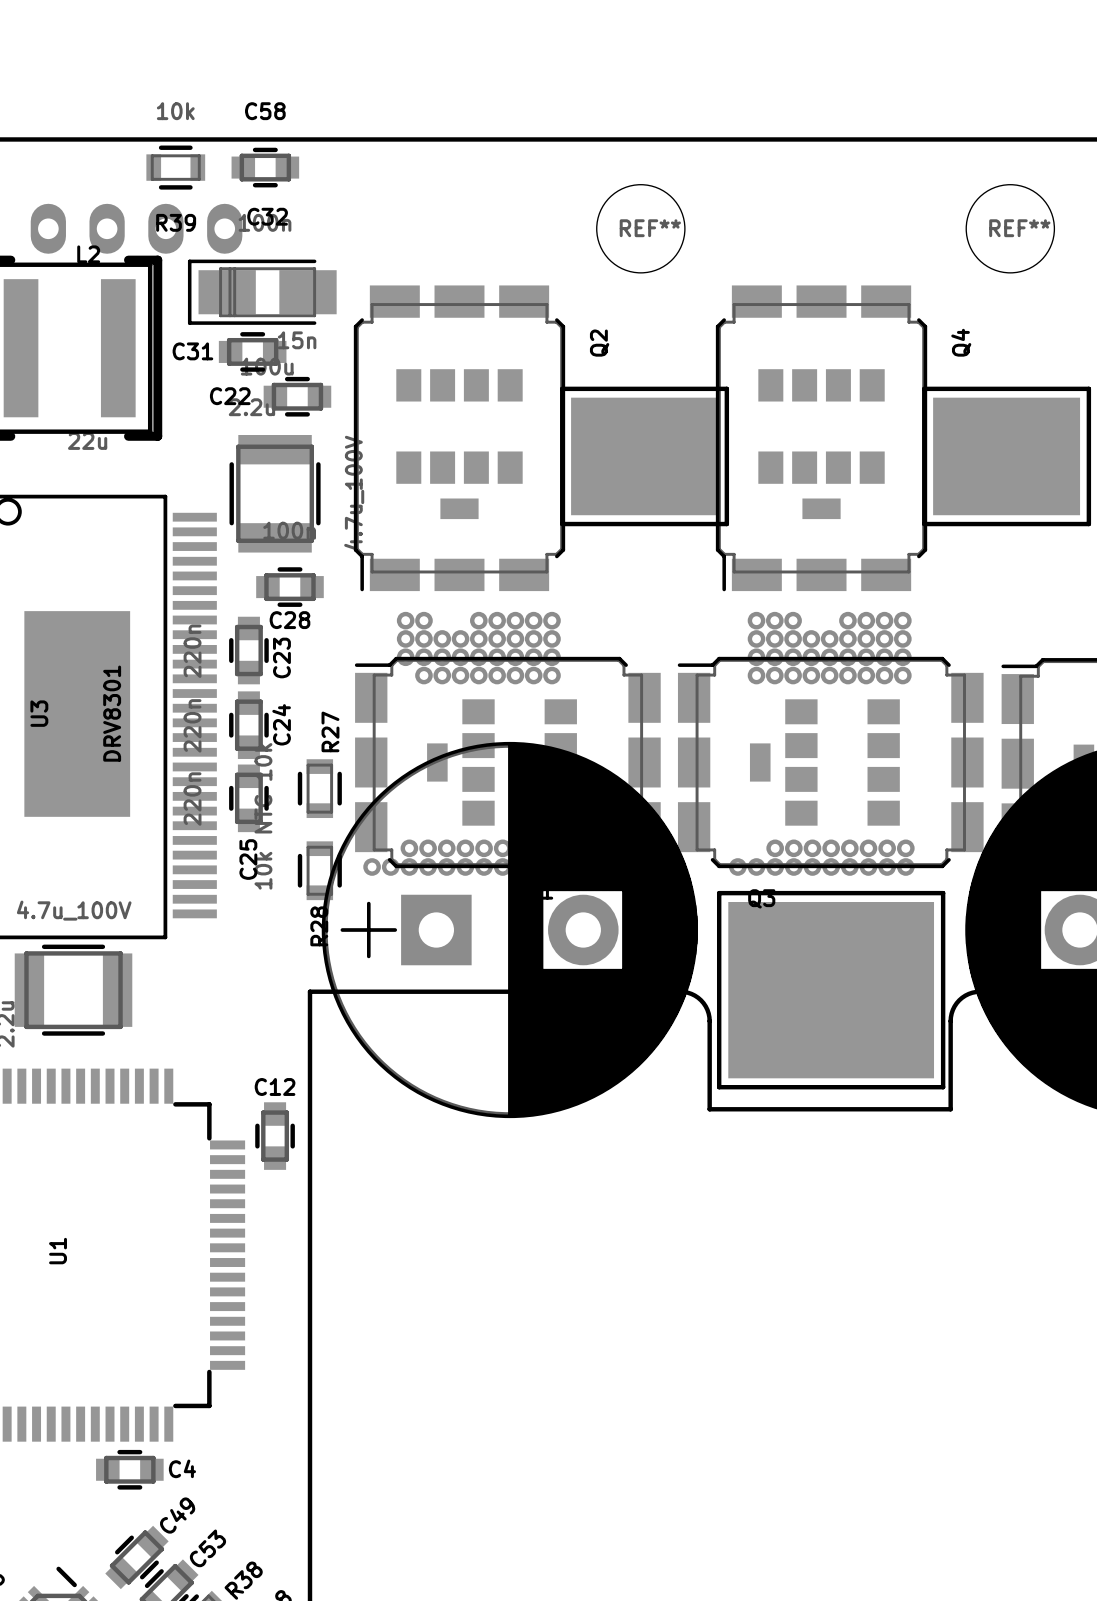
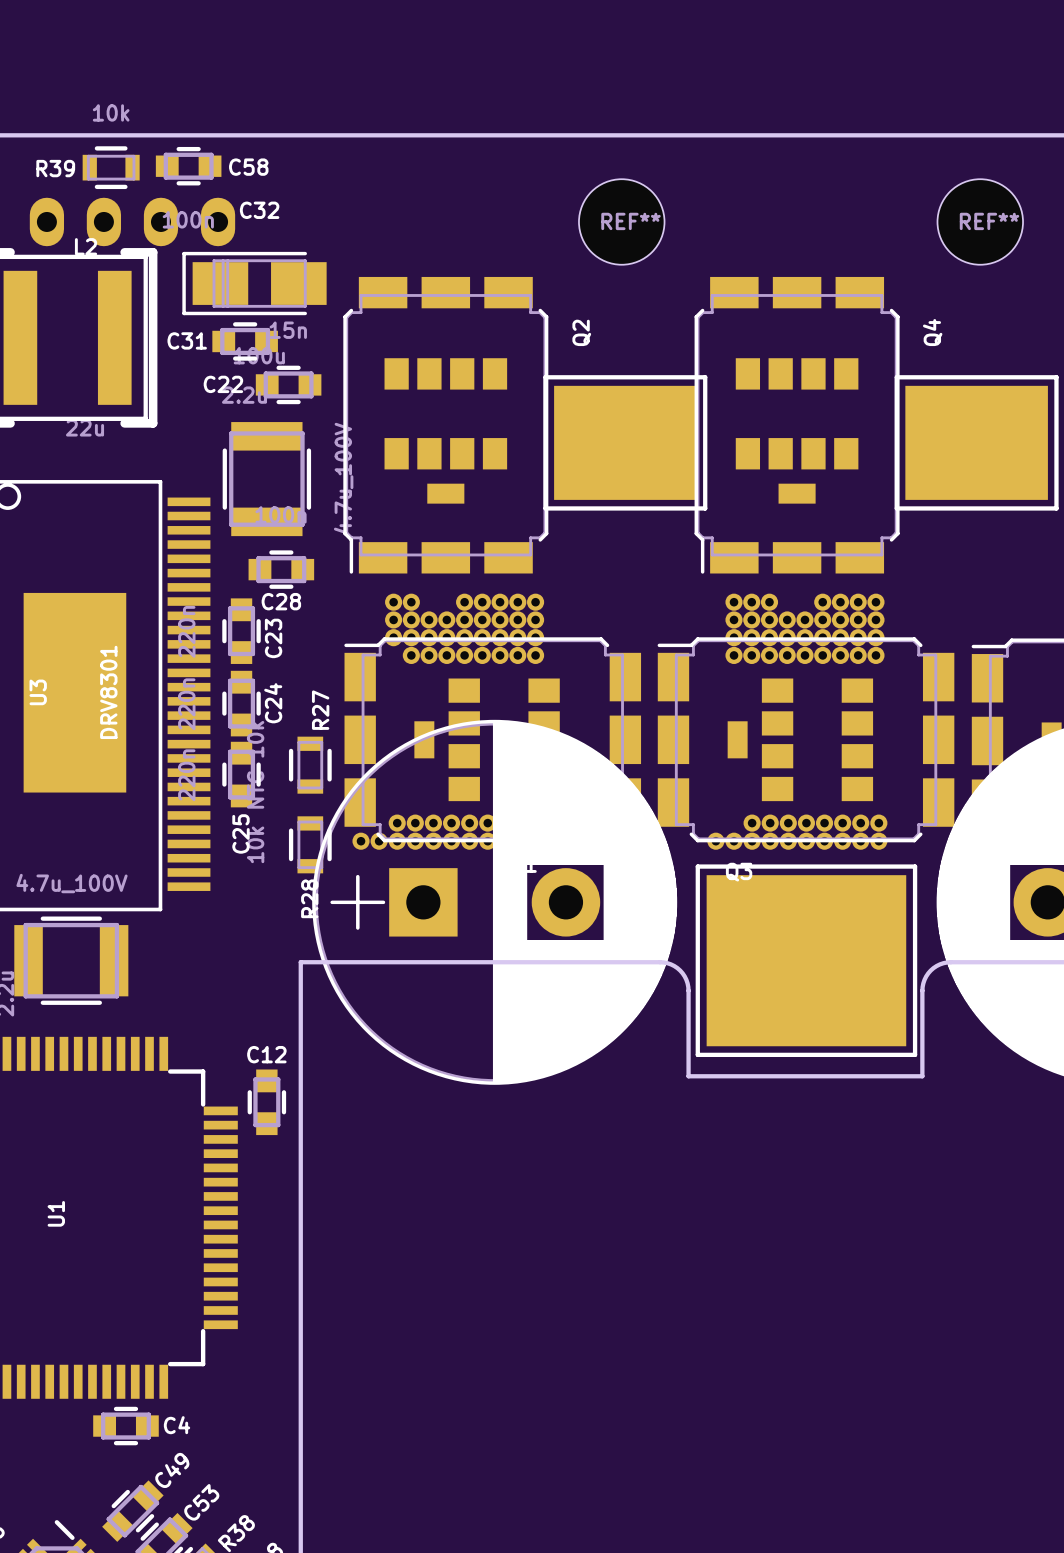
C58 name position: C58 (265, 111) -> C58 (248, 167)
R39 position: (175, 167) -> (111, 167)
C58 position: (265, 167) -> (188, 166)
R39 name position: R39 (176, 222) -> R39 (55, 168)

